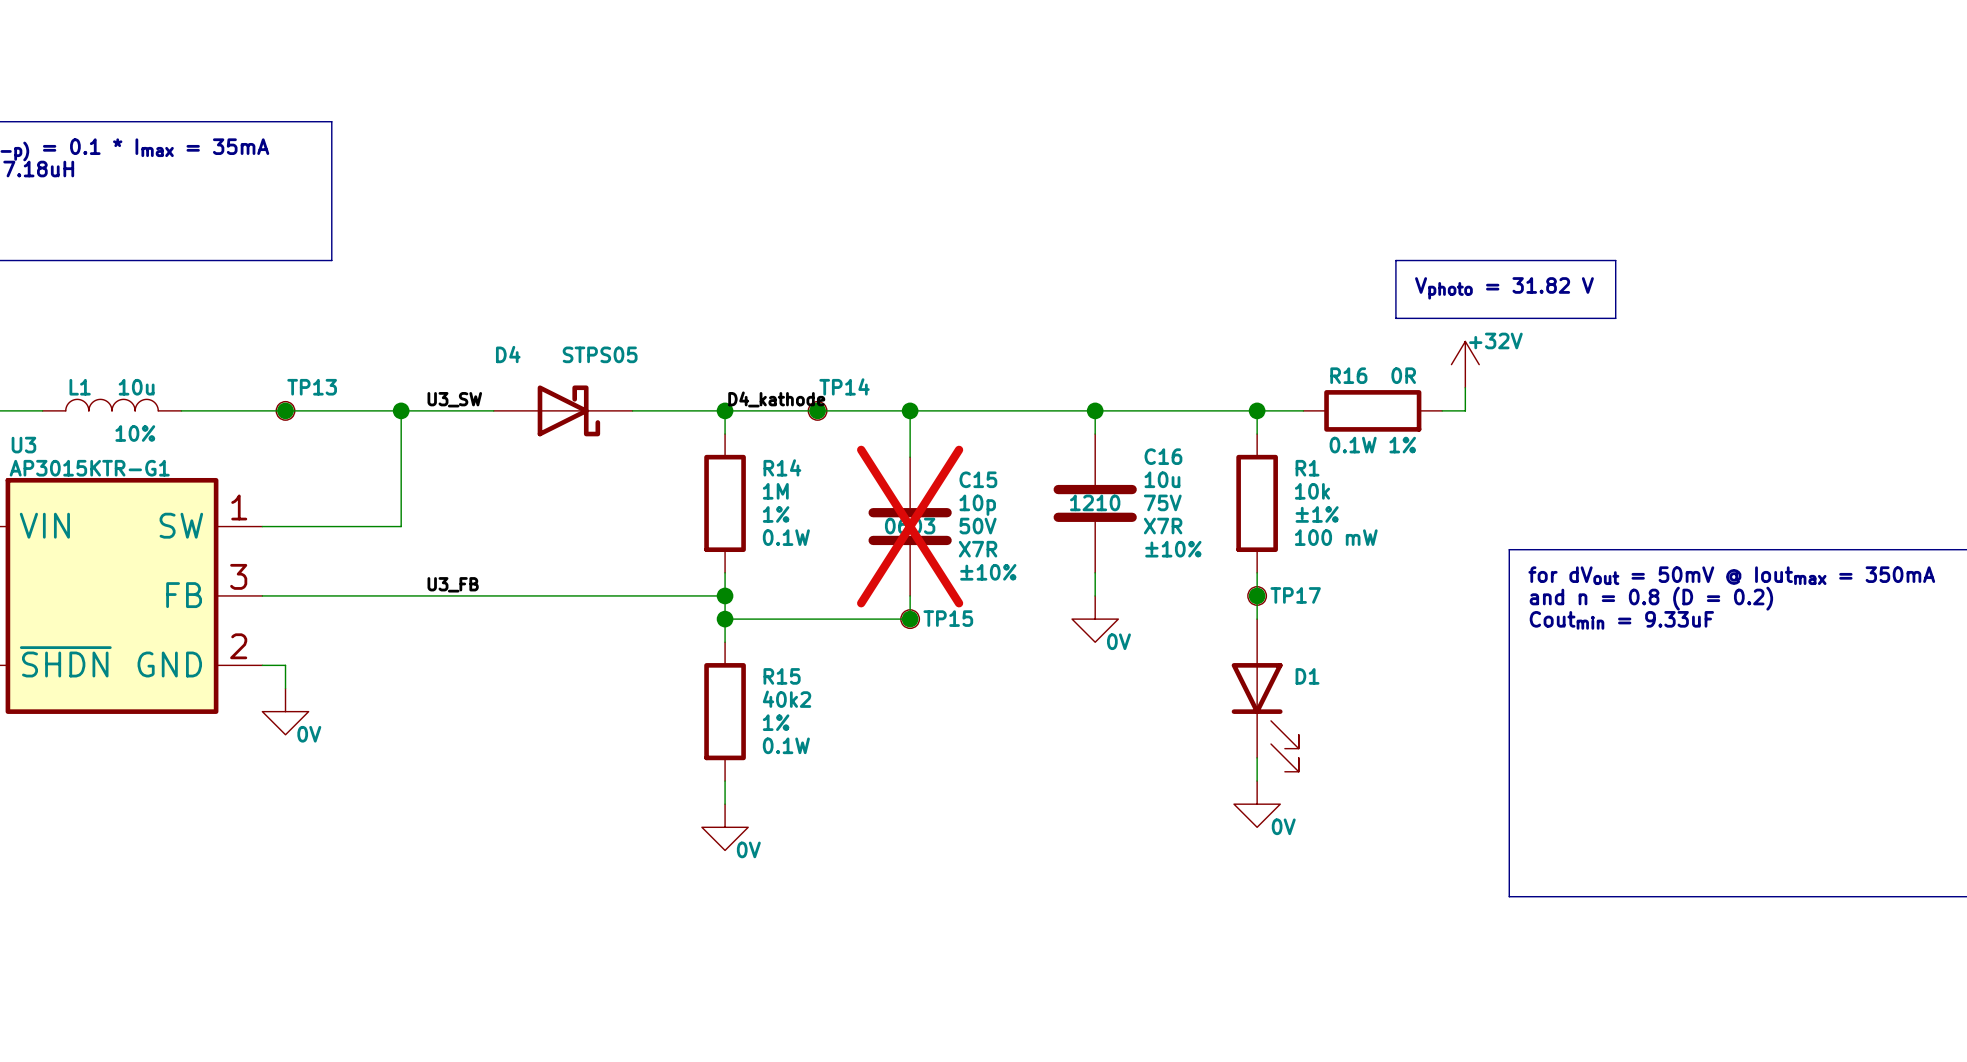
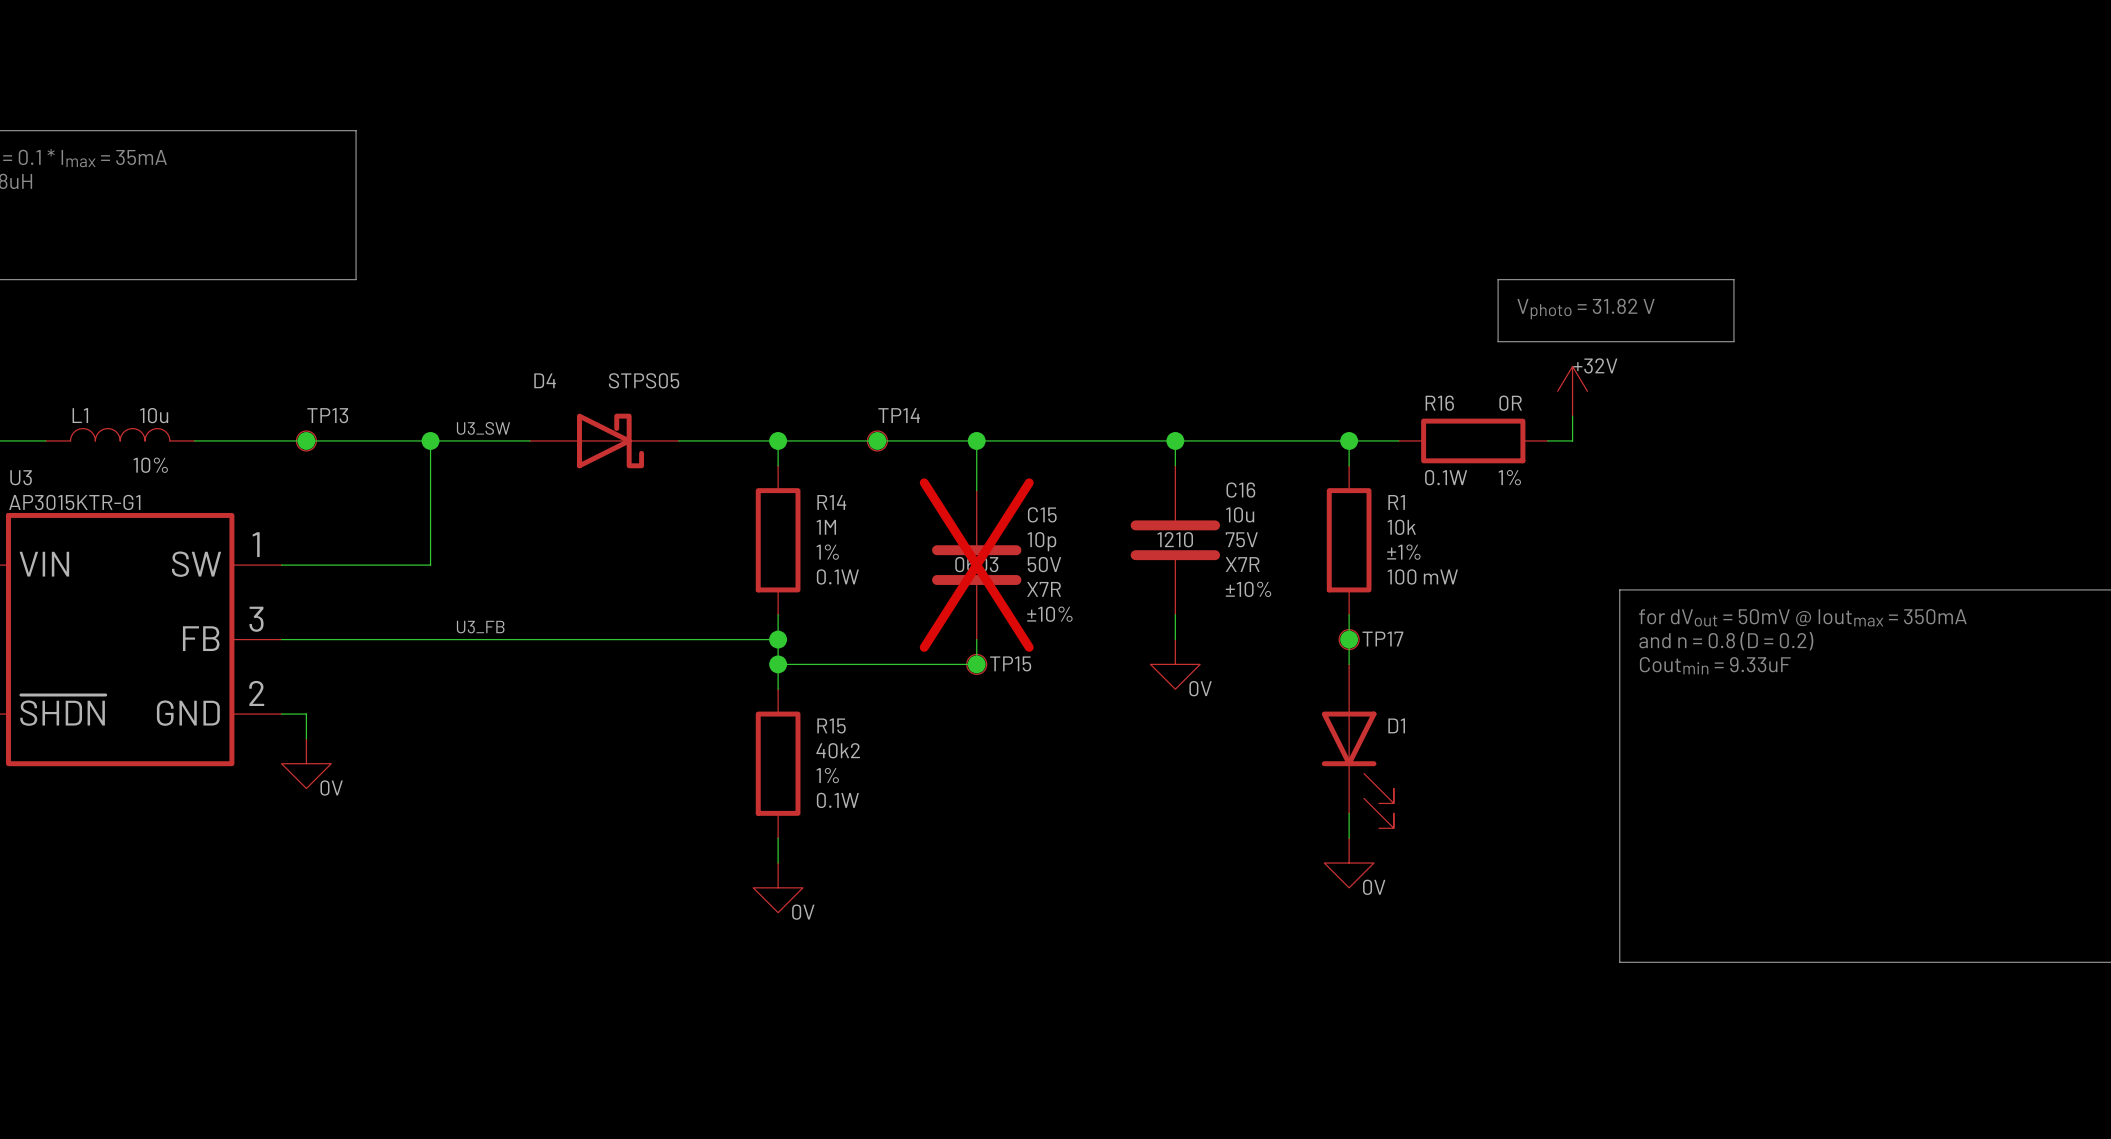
label: D4_kathode (776, 399) -> none

